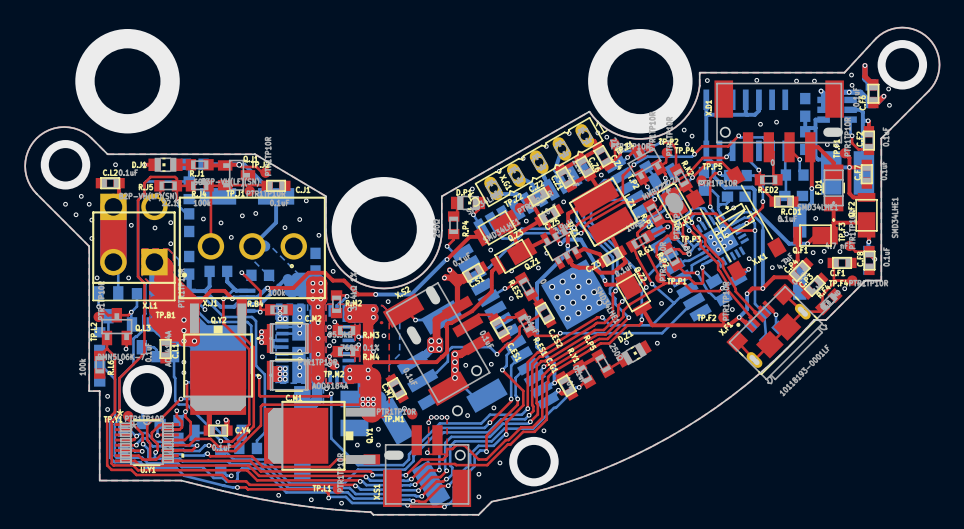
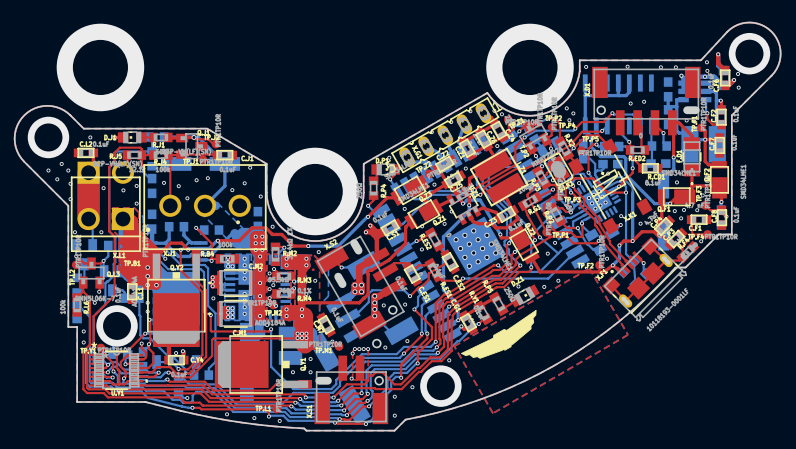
top zone outline: none -> (589, 268) (454, 346) (493, 413) (627, 334) (589, 268)
drawing: none -> [461, 309, 537, 359]

